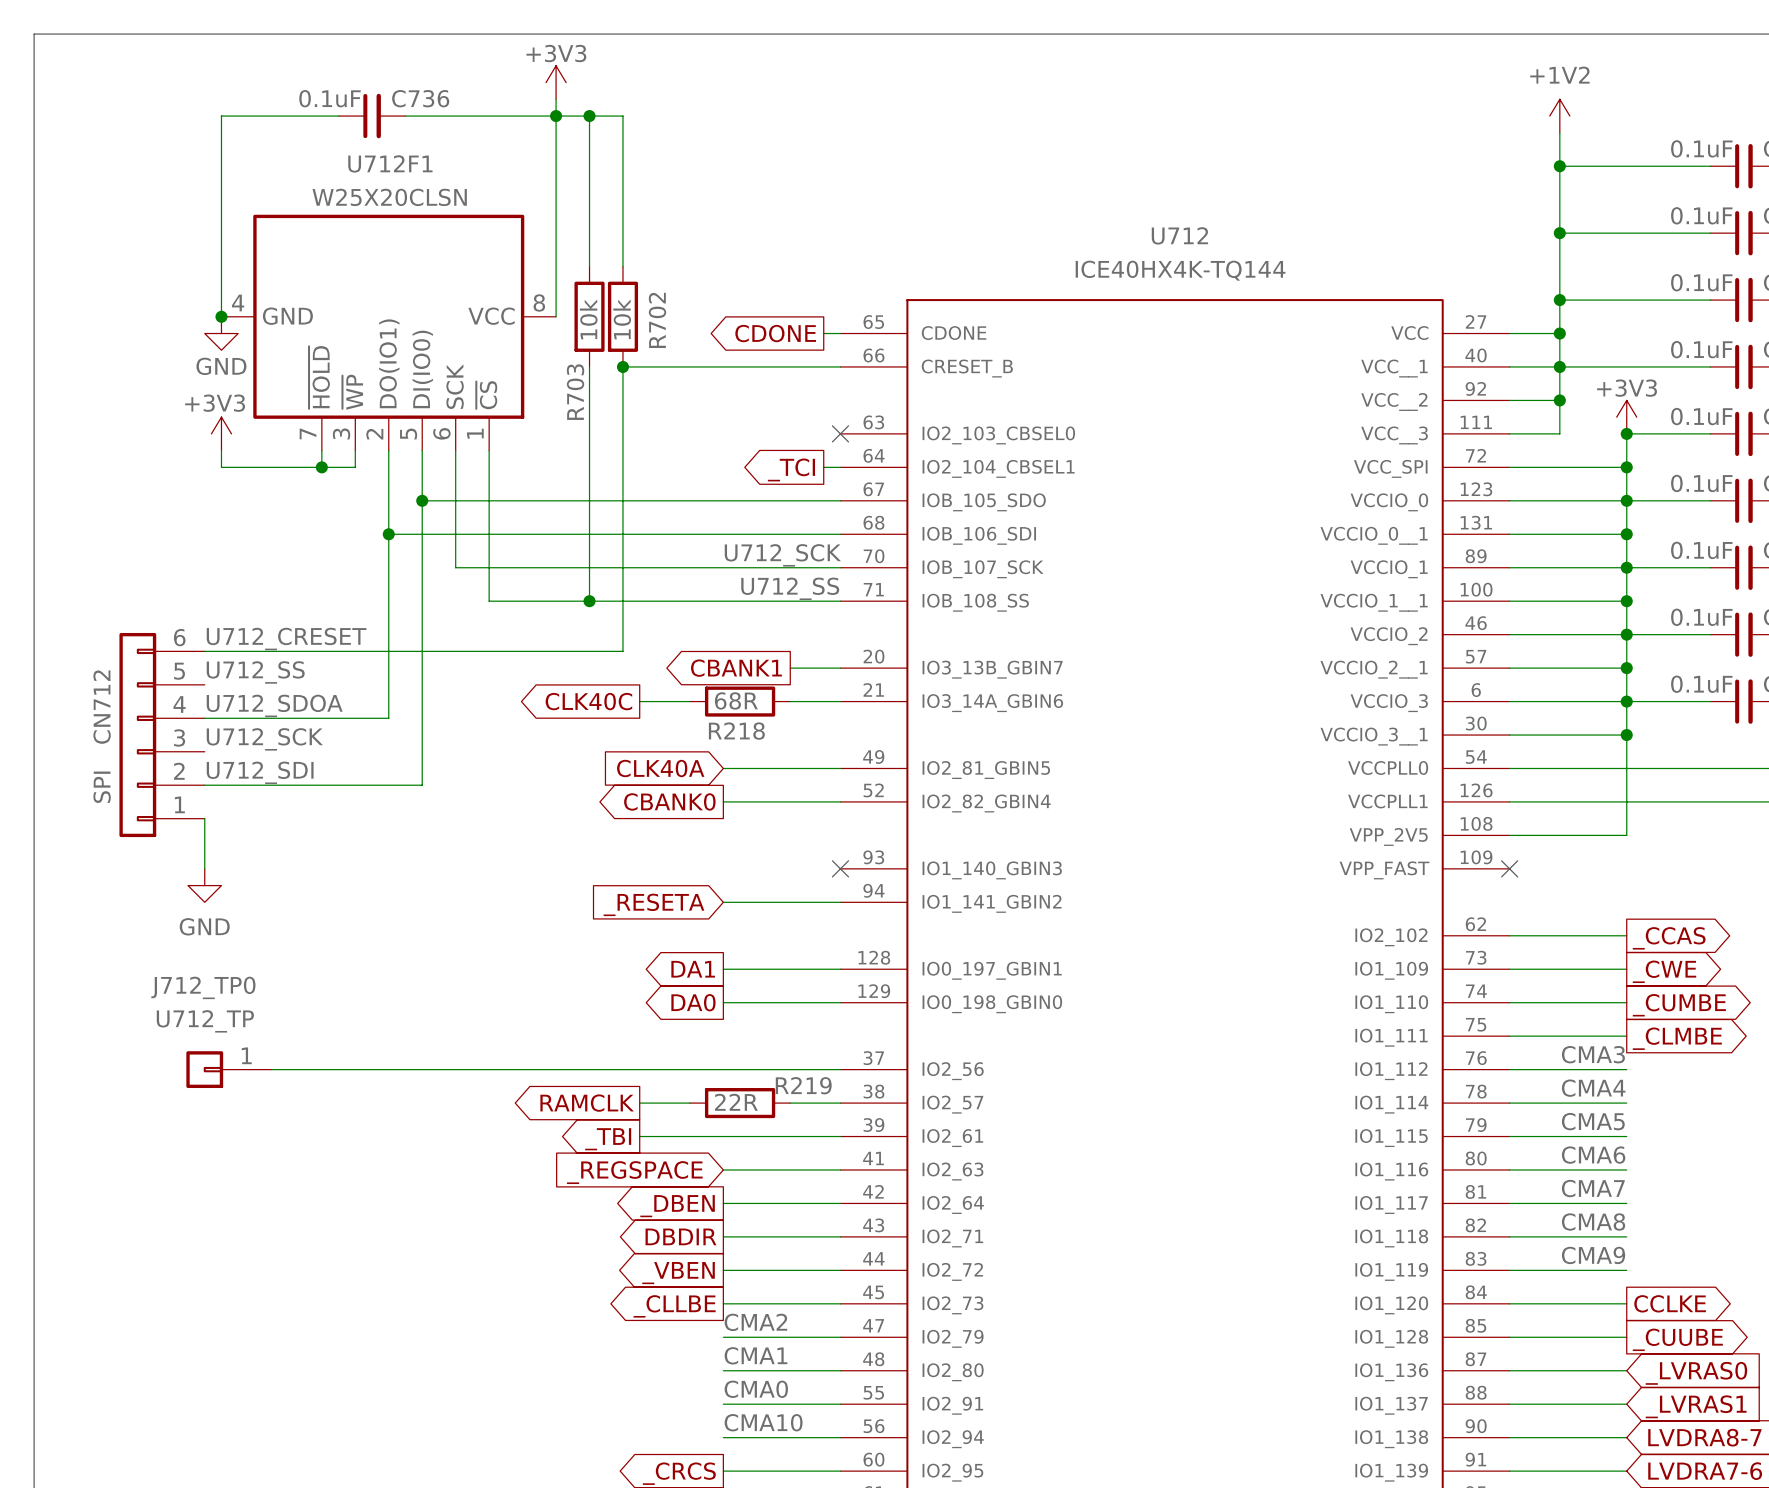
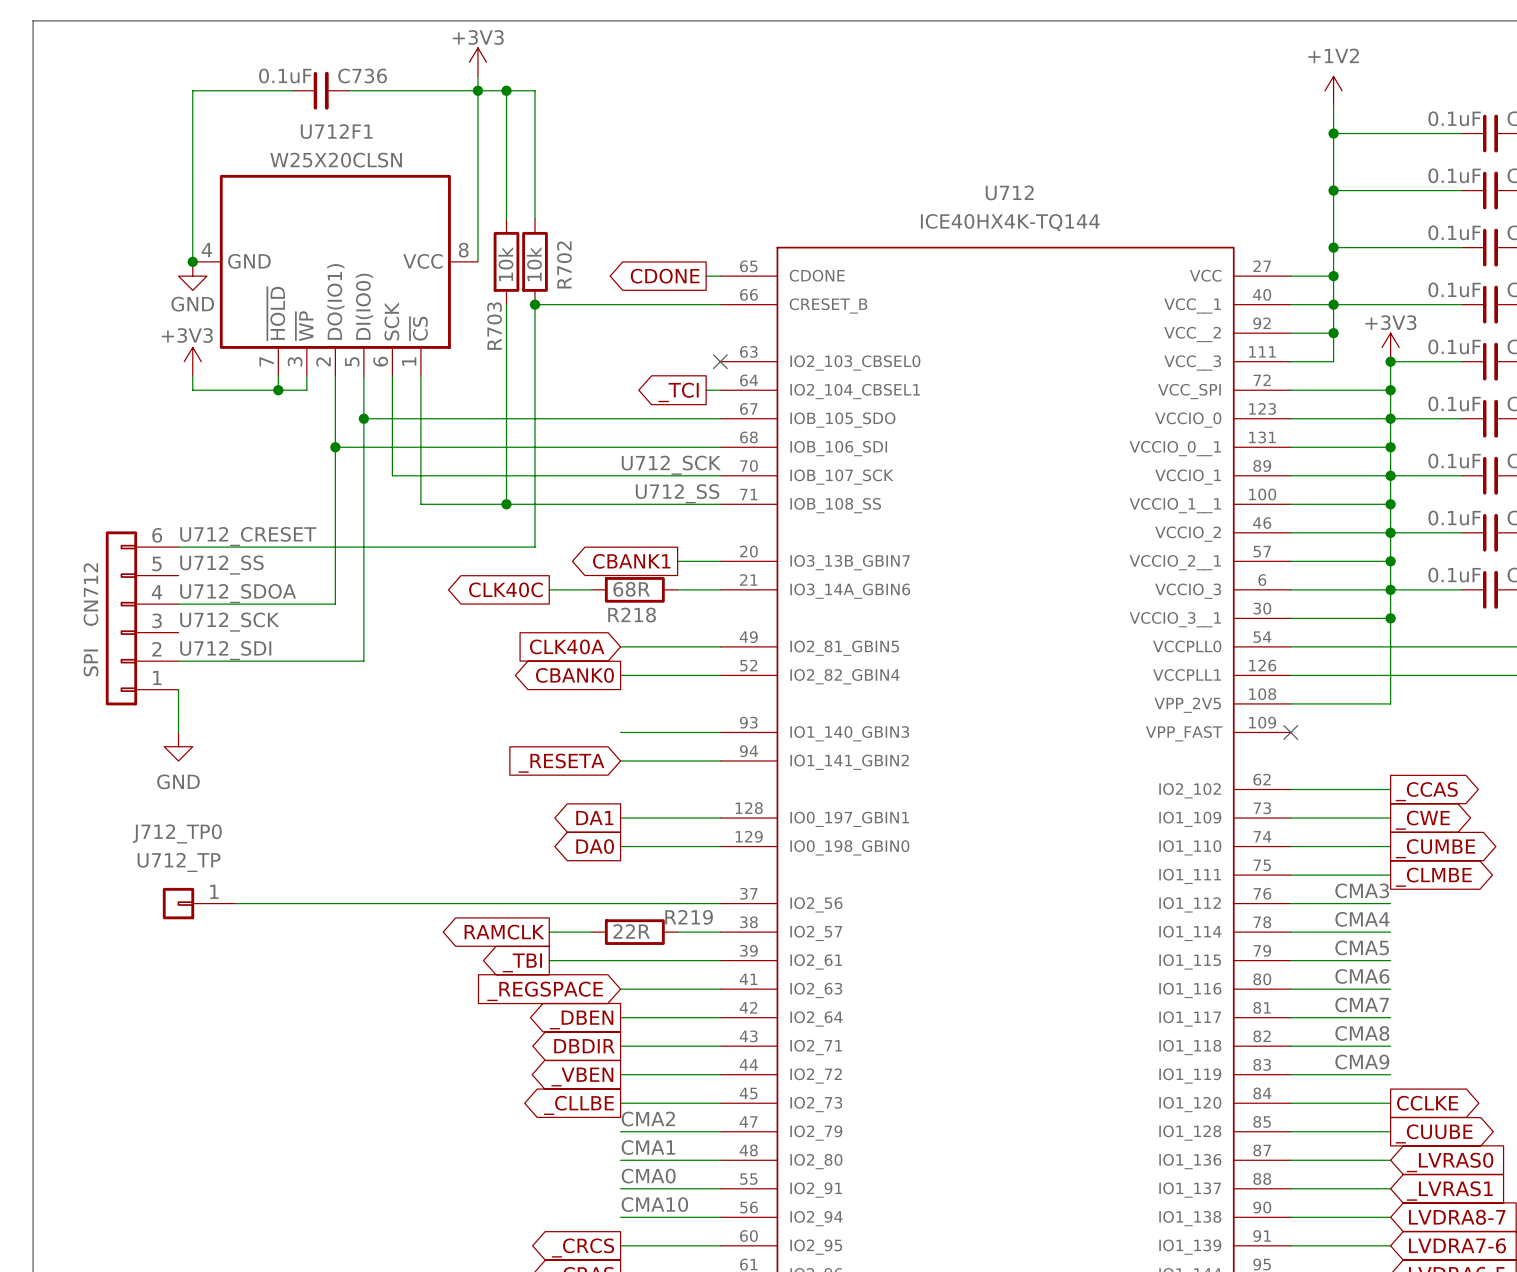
wire: none -> (620, 732) (720, 732)
no-connect mark: (840, 868) -> none

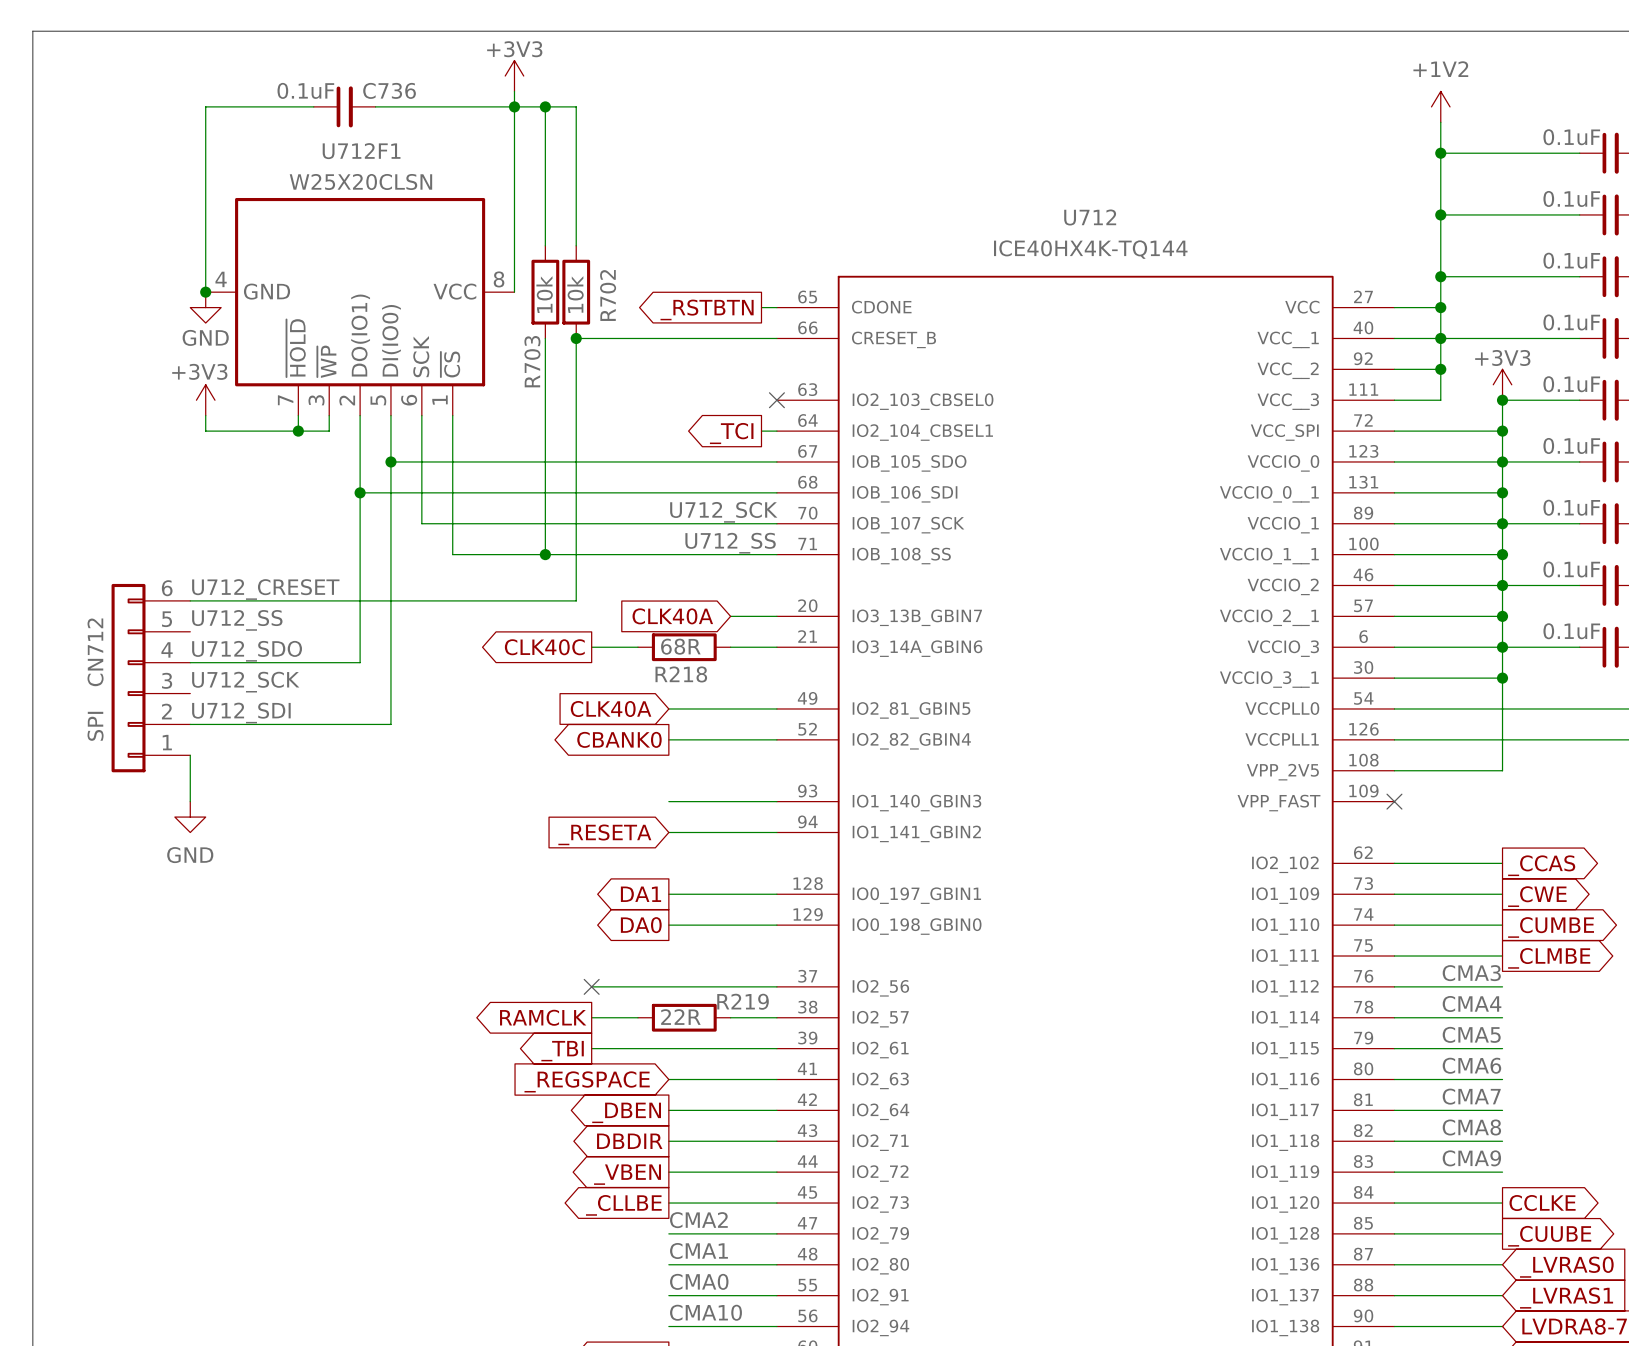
global label: CDONE (665, 276) -> _RSTBTN (707, 309)
global label shape: output (631, 561) -> input (672, 616)
global label: CBANK1 (631, 561) -> CLK40A (672, 616)
label: U712_SDOA (238, 593) -> U712_SDO (247, 651)
J712_TP0: U712_TP (199, 903) -> none
wire: (235, 903) (549, 903) -> none
no-connect mark: none -> (591, 986)

